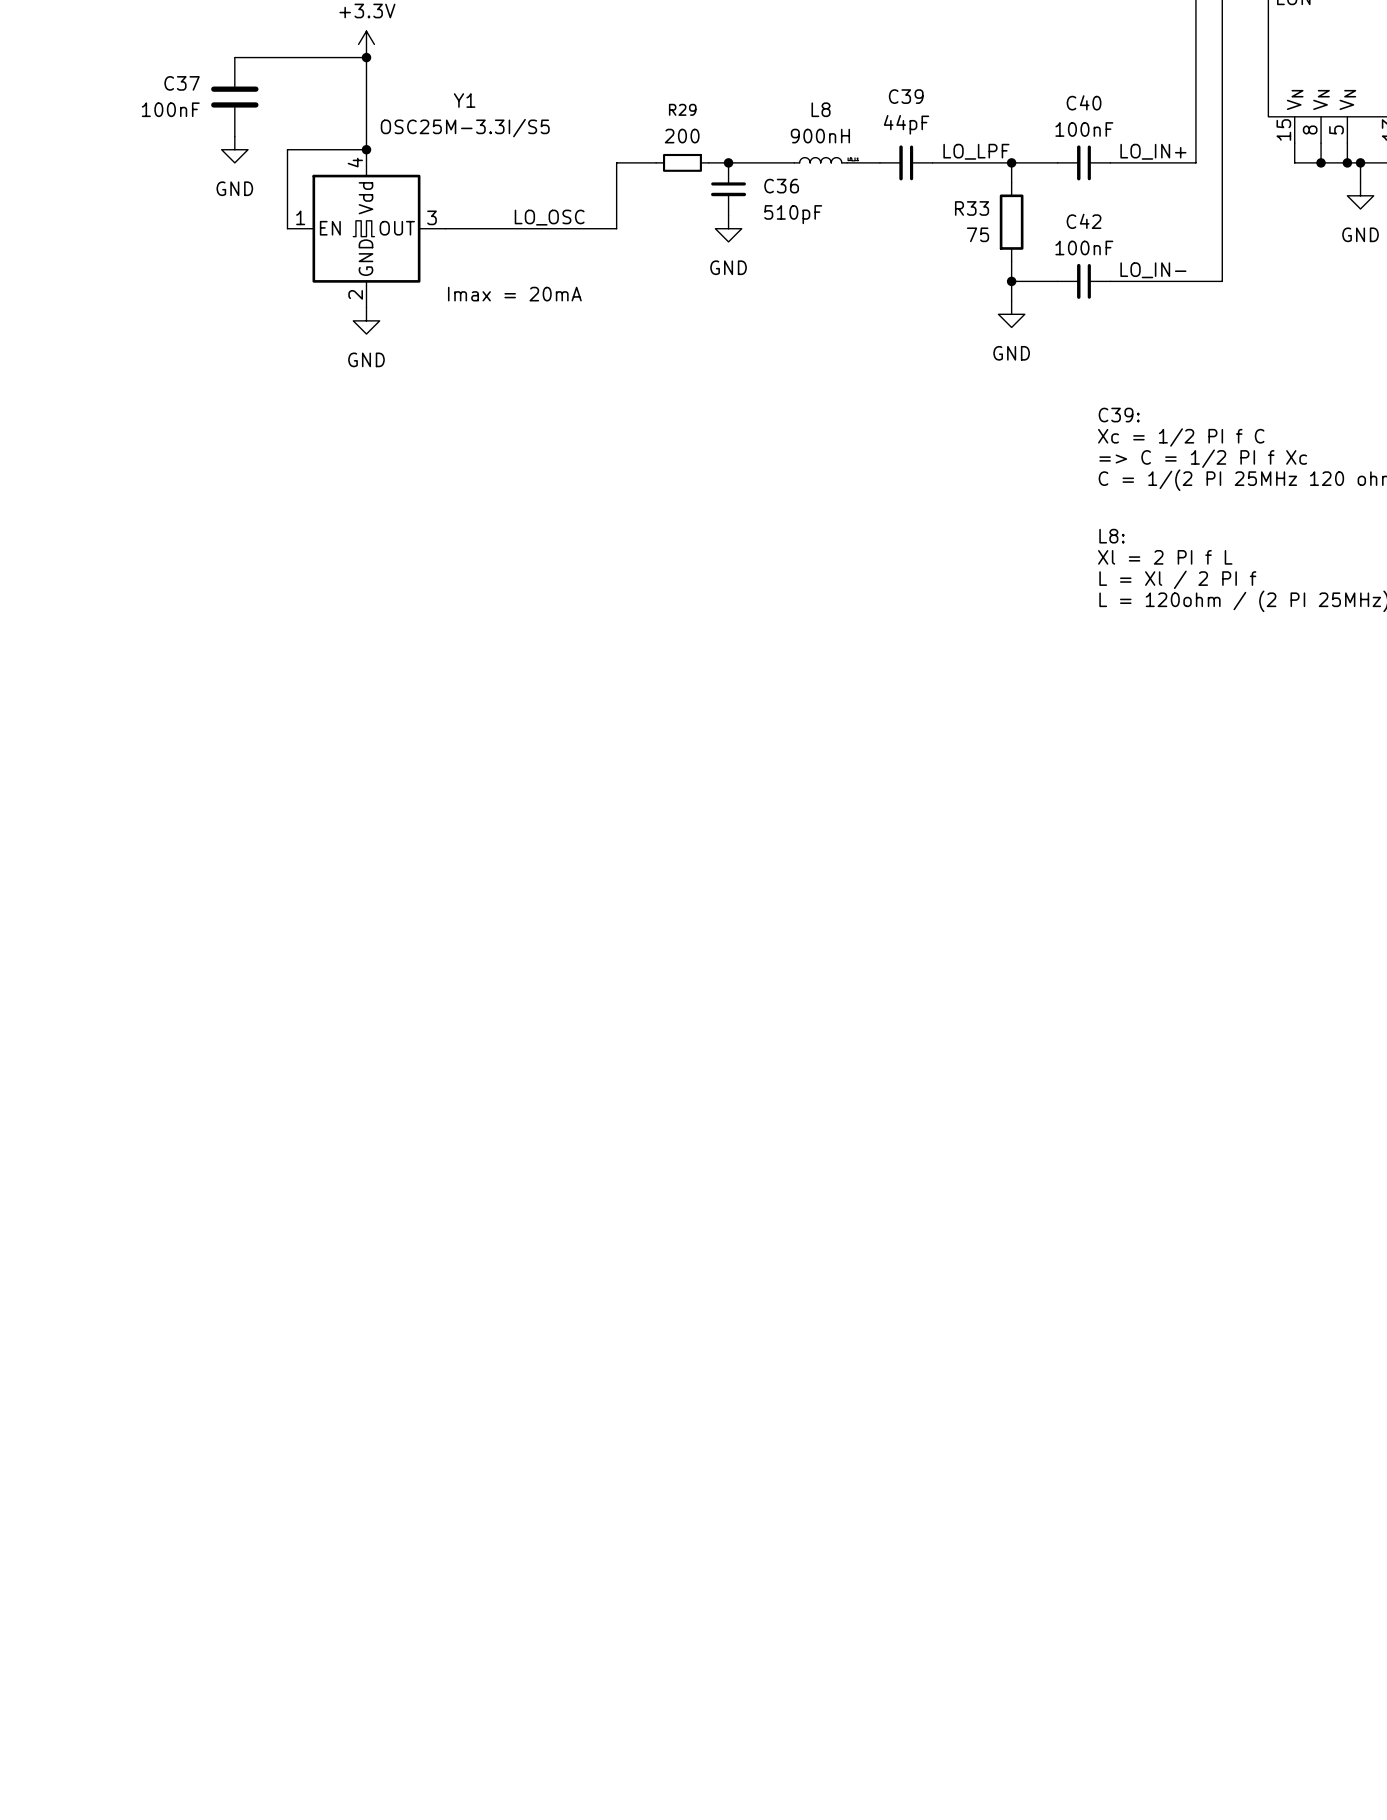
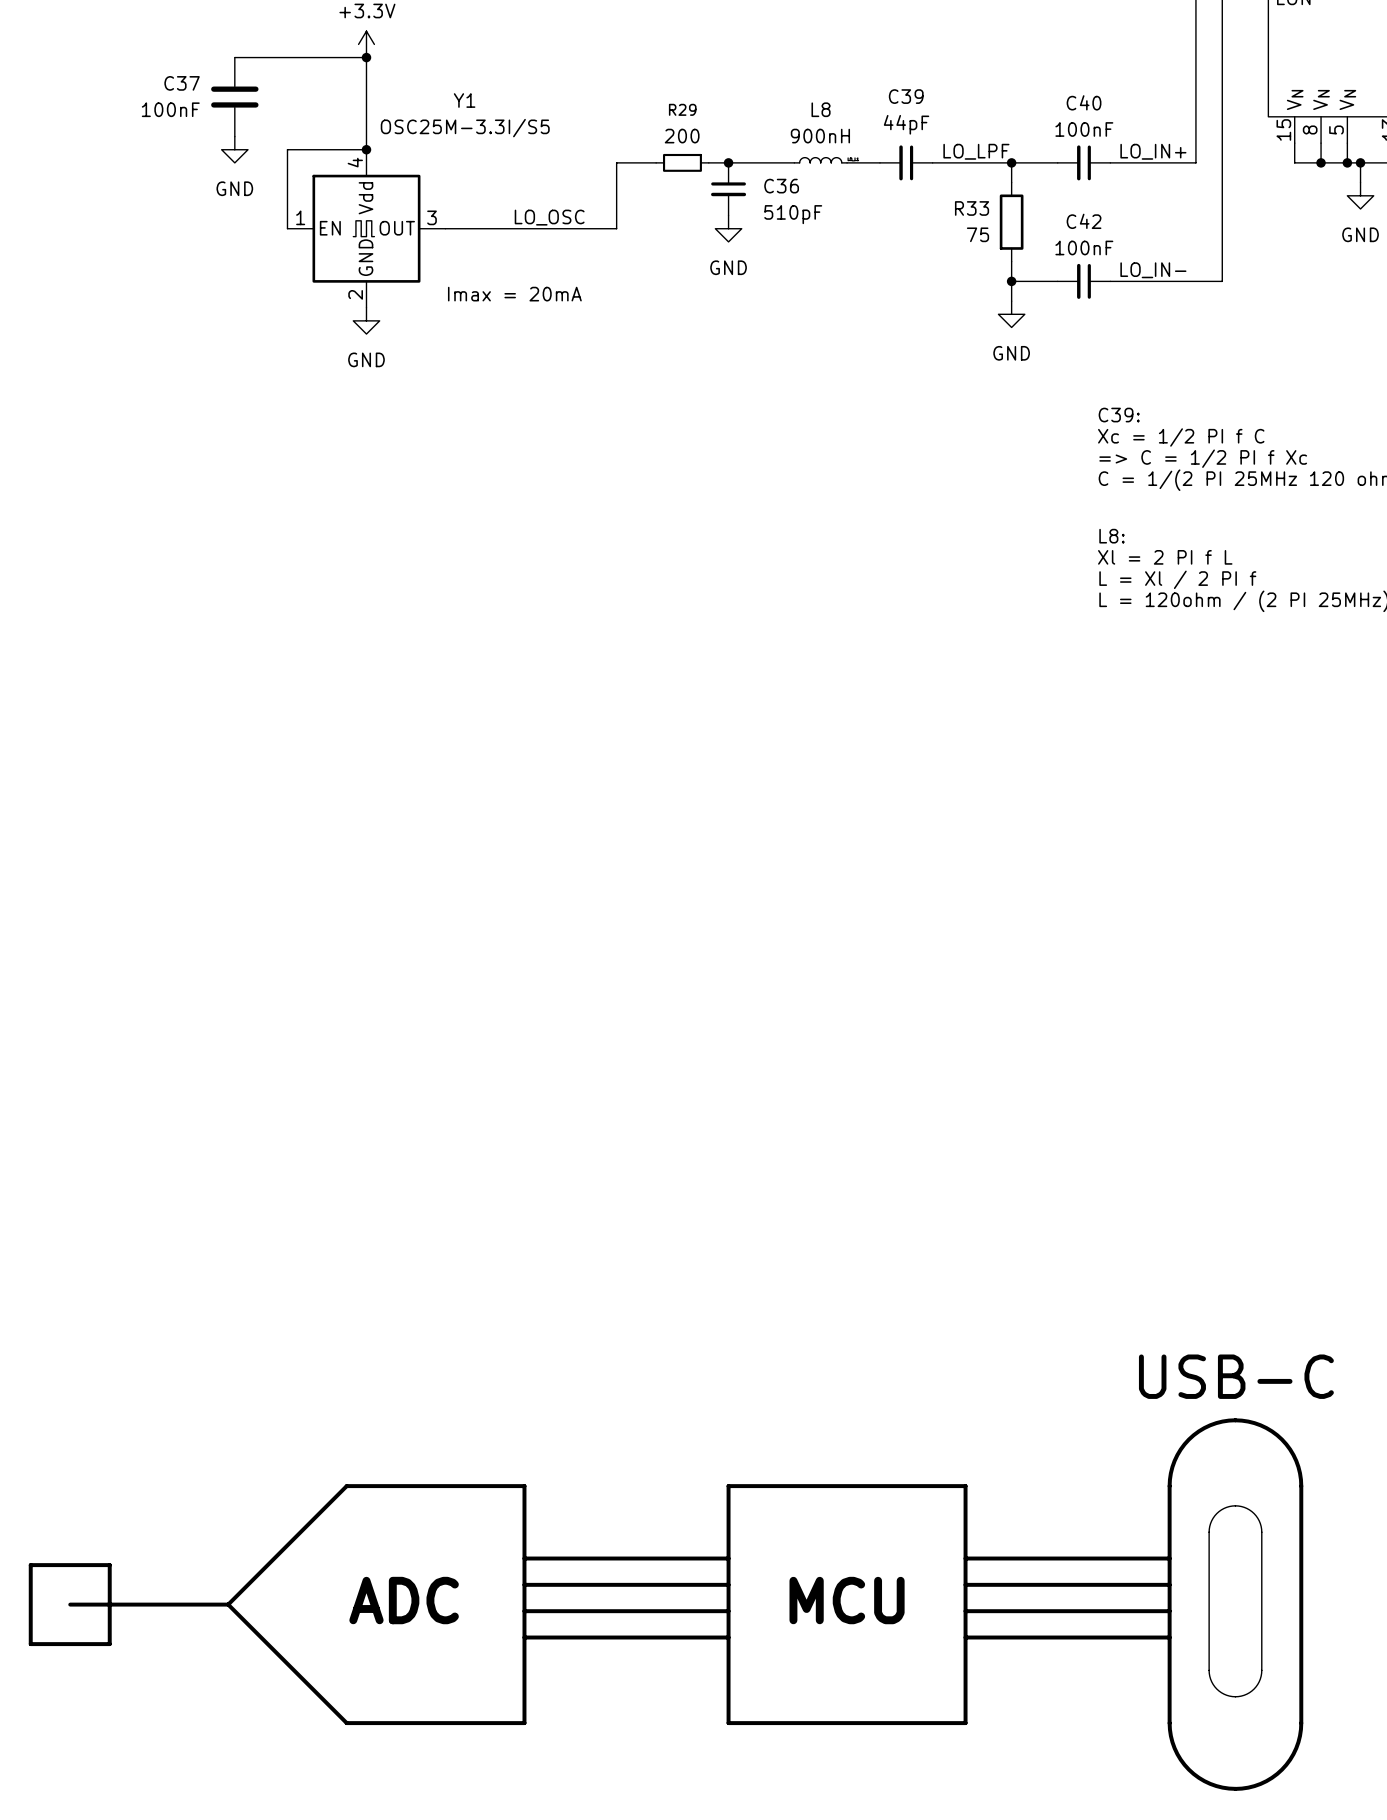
text: none -> USB-C (1236, 1376)
line: none -> (1235, 1420) (1216, 1423) (1193, 1435) (1177, 1455) (1170, 1473) (1169, 1723) (1174, 1748) (1188, 1769) (1210, 1783) (1235, 1788) (1254, 1786) (1277, 1773) (1290, 1759) (1300, 1735) (1301, 1486) (1296, 1460) (1281, 1439) (1260, 1425) (1235, 1420)
line: none -> (728, 1486) (965, 1486) (965, 1723) (728, 1723) (728, 1486)
line: none -> (1235, 1505) (1246, 1508) (1254, 1513) (1259, 1520) (1261, 1532) (1261, 1673) (1254, 1689) (1246, 1694) (1235, 1696) (1226, 1695) (1216, 1689) (1211, 1681) (1209, 1670) (1209, 1529) (1216, 1513) (1224, 1508) (1235, 1505)
line: none -> (524, 1558) (728, 1558)
line: none -> (965, 1558) (1169, 1558)
line: none -> (30, 1565) (109, 1565) (109, 1644) (30, 1644) (30, 1565)
line: none -> (524, 1584) (728, 1584)
line: none -> (965, 1584) (1169, 1584)
text: none -> ADC (404, 1600)
text: none -> MCU (847, 1600)
line: none -> (70, 1604) (228, 1604)
line: none -> (228, 1604) (346, 1723) (524, 1723) (524, 1486) (346, 1486) (228, 1604)
line: none -> (524, 1611) (728, 1611)
line: none -> (965, 1611) (1169, 1611)
line: none -> (524, 1637) (728, 1637)
line: none -> (965, 1637) (1169, 1637)

